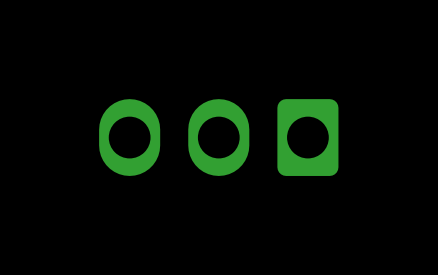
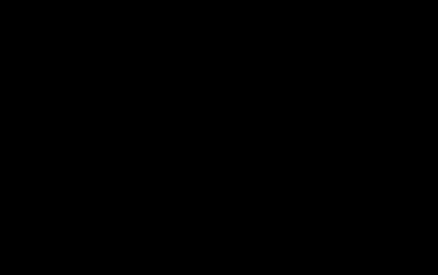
part: (218, 137) -> none

